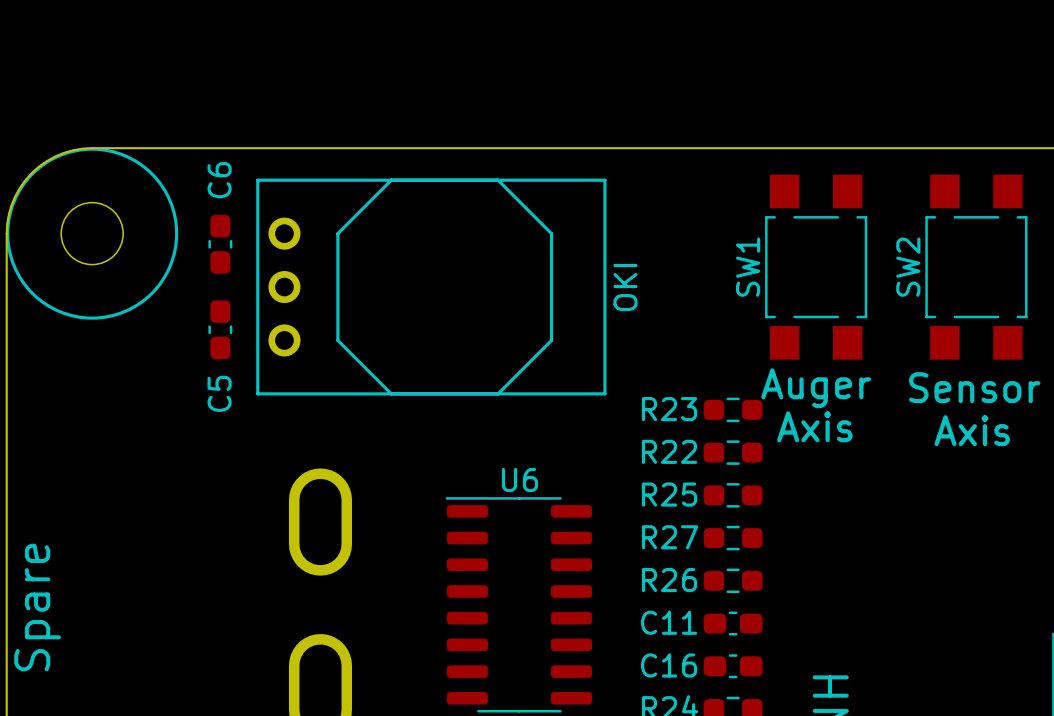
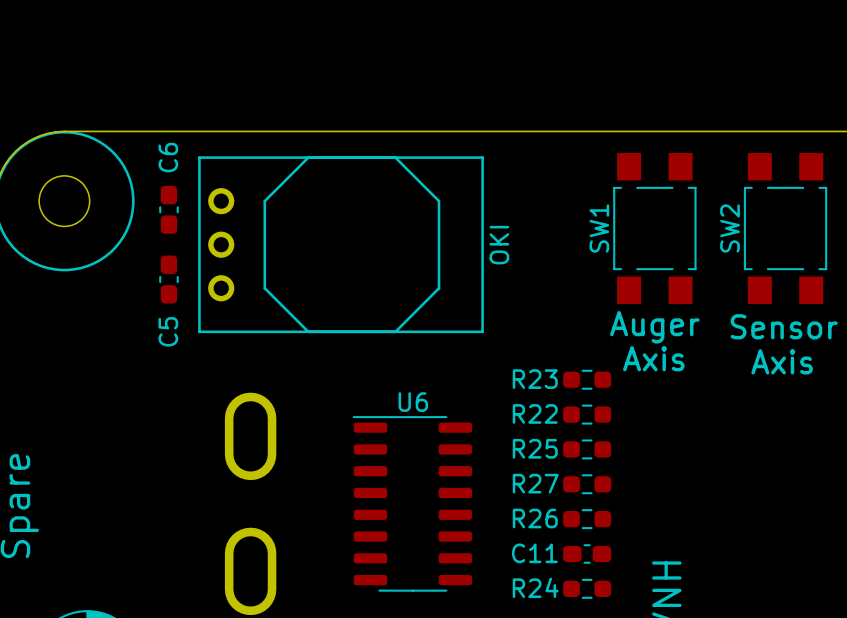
R23: (733, 409) -> none
R22 name: R22 (669, 451) -> R23 (535, 379)
R25 name: R25 (669, 494) -> R22 (535, 413)
R27 name: R27 (670, 537) -> R25 (535, 448)
R26 name: R26 (669, 580) -> R27 (535, 483)
C11: (733, 623) -> none
R26: none -> (587, 519)
C16 name: C16 (669, 665) -> C11 (534, 553)

